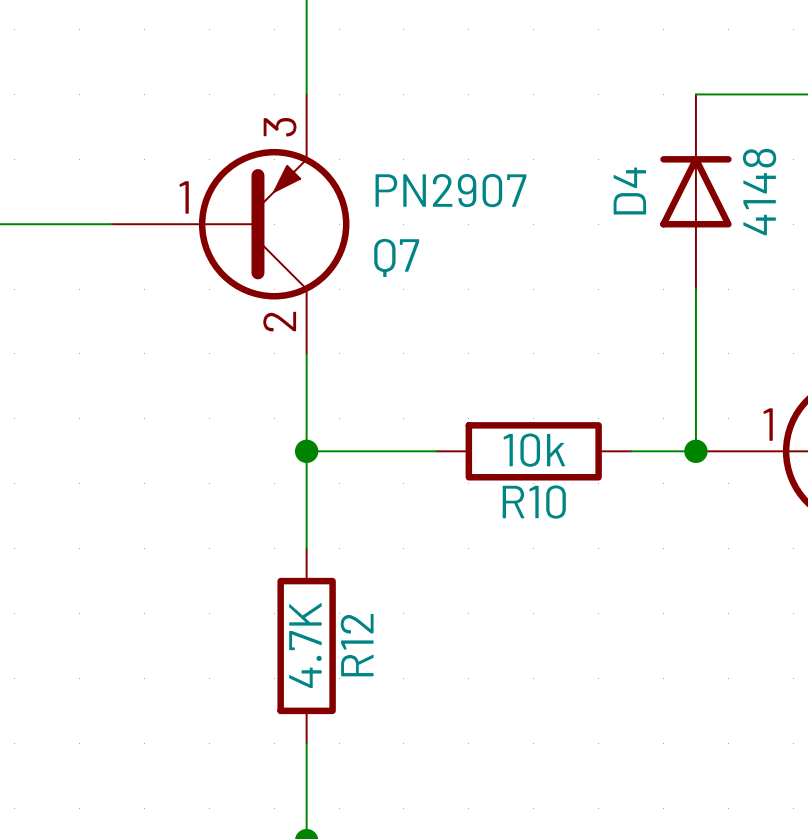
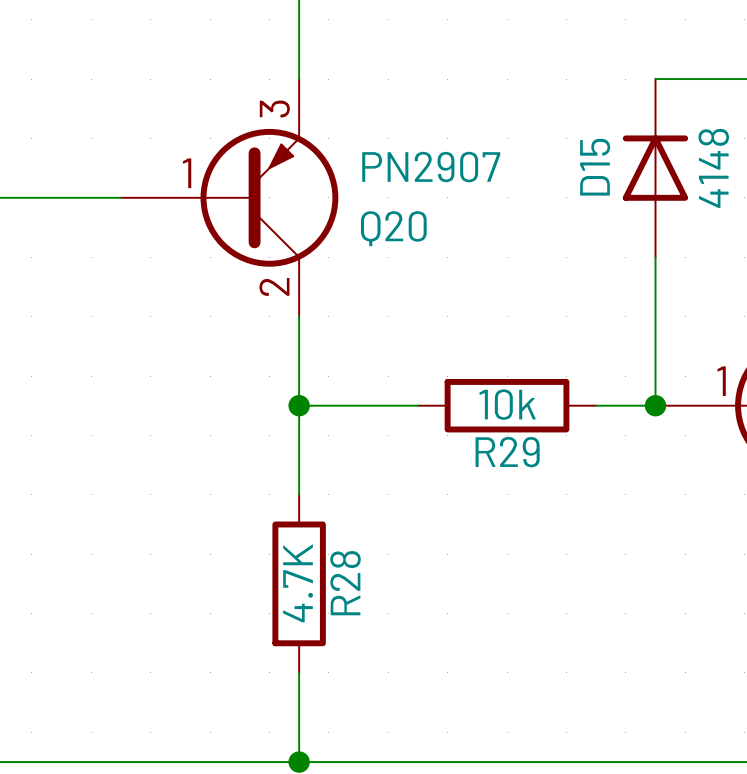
D4 name: D4 (629, 191) -> D15 (595, 167)
Q7 name: Q7 (396, 257) -> Q20 (393, 228)
R10 name: R10 (534, 502) -> R29 (507, 452)
R12 name: R12 (357, 645) -> R28 (345, 583)

